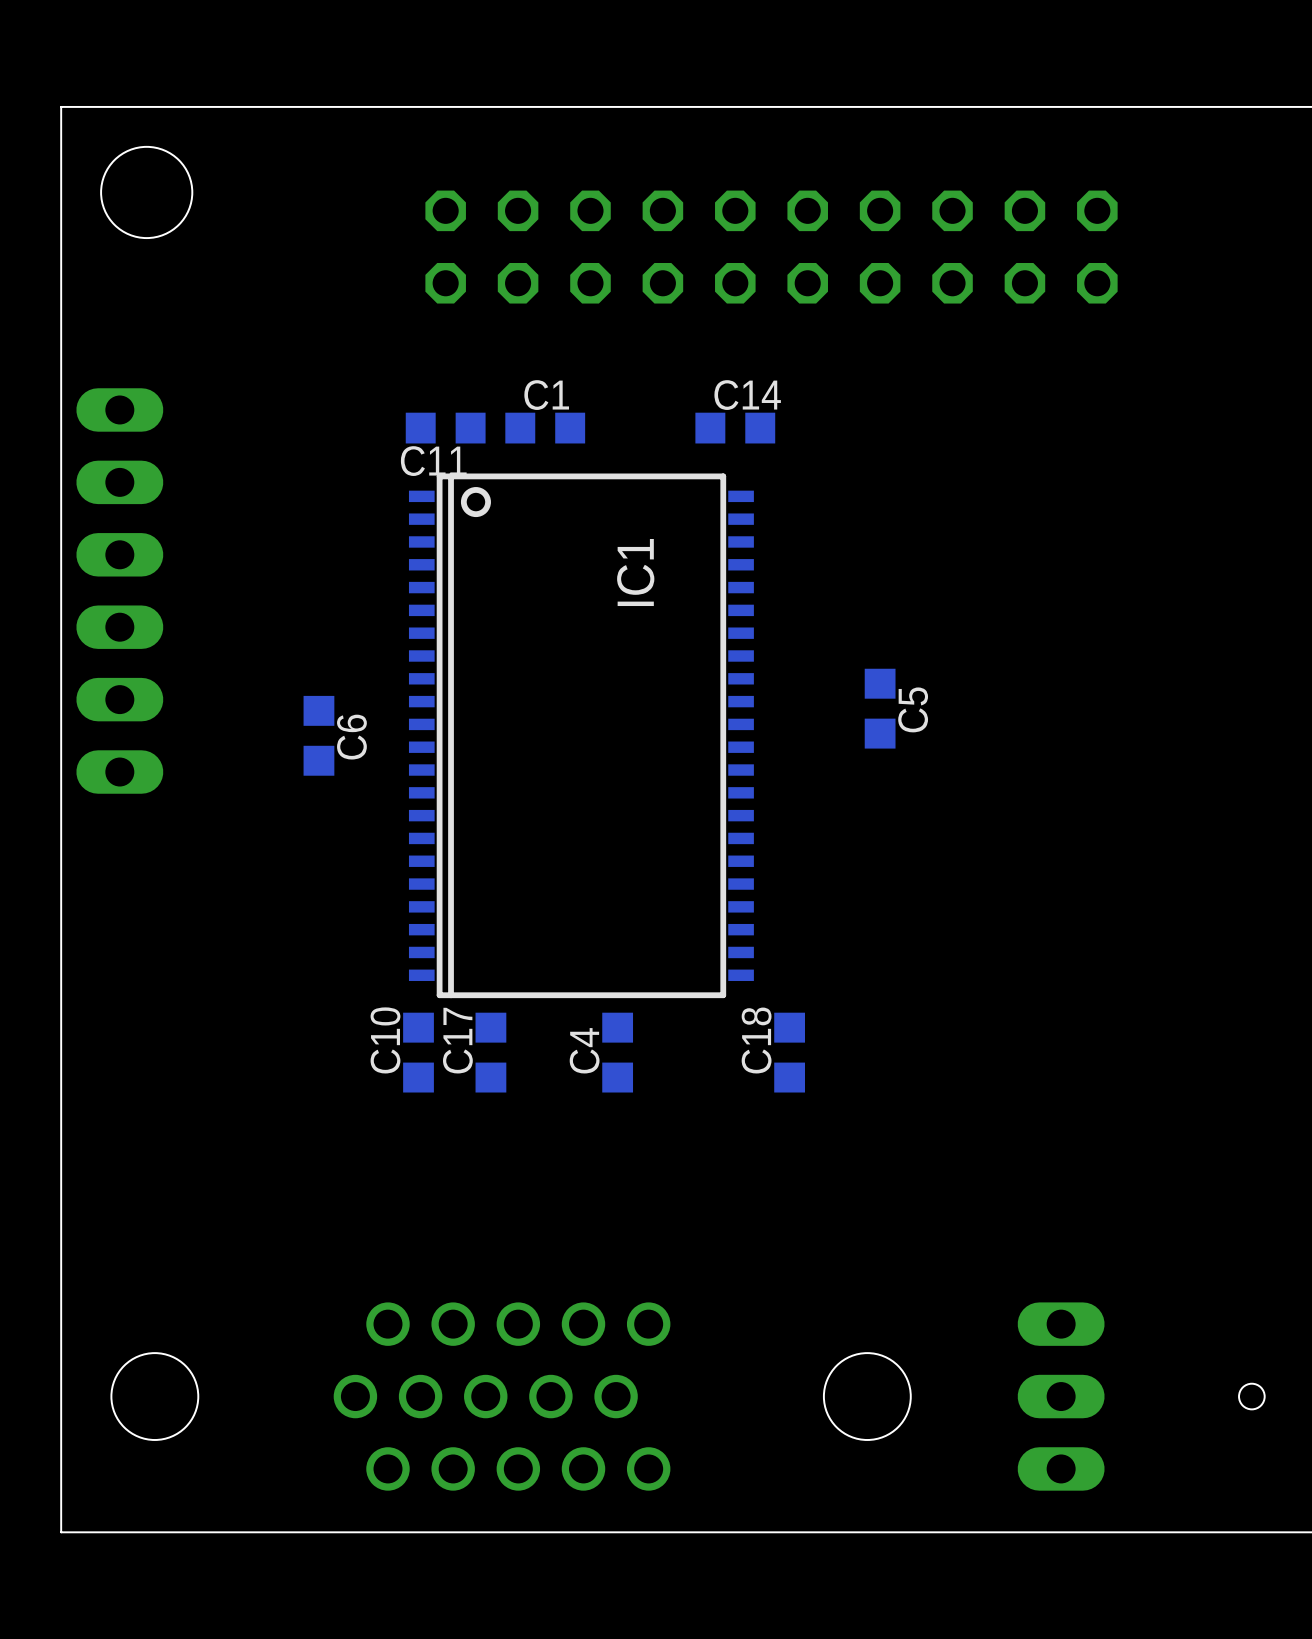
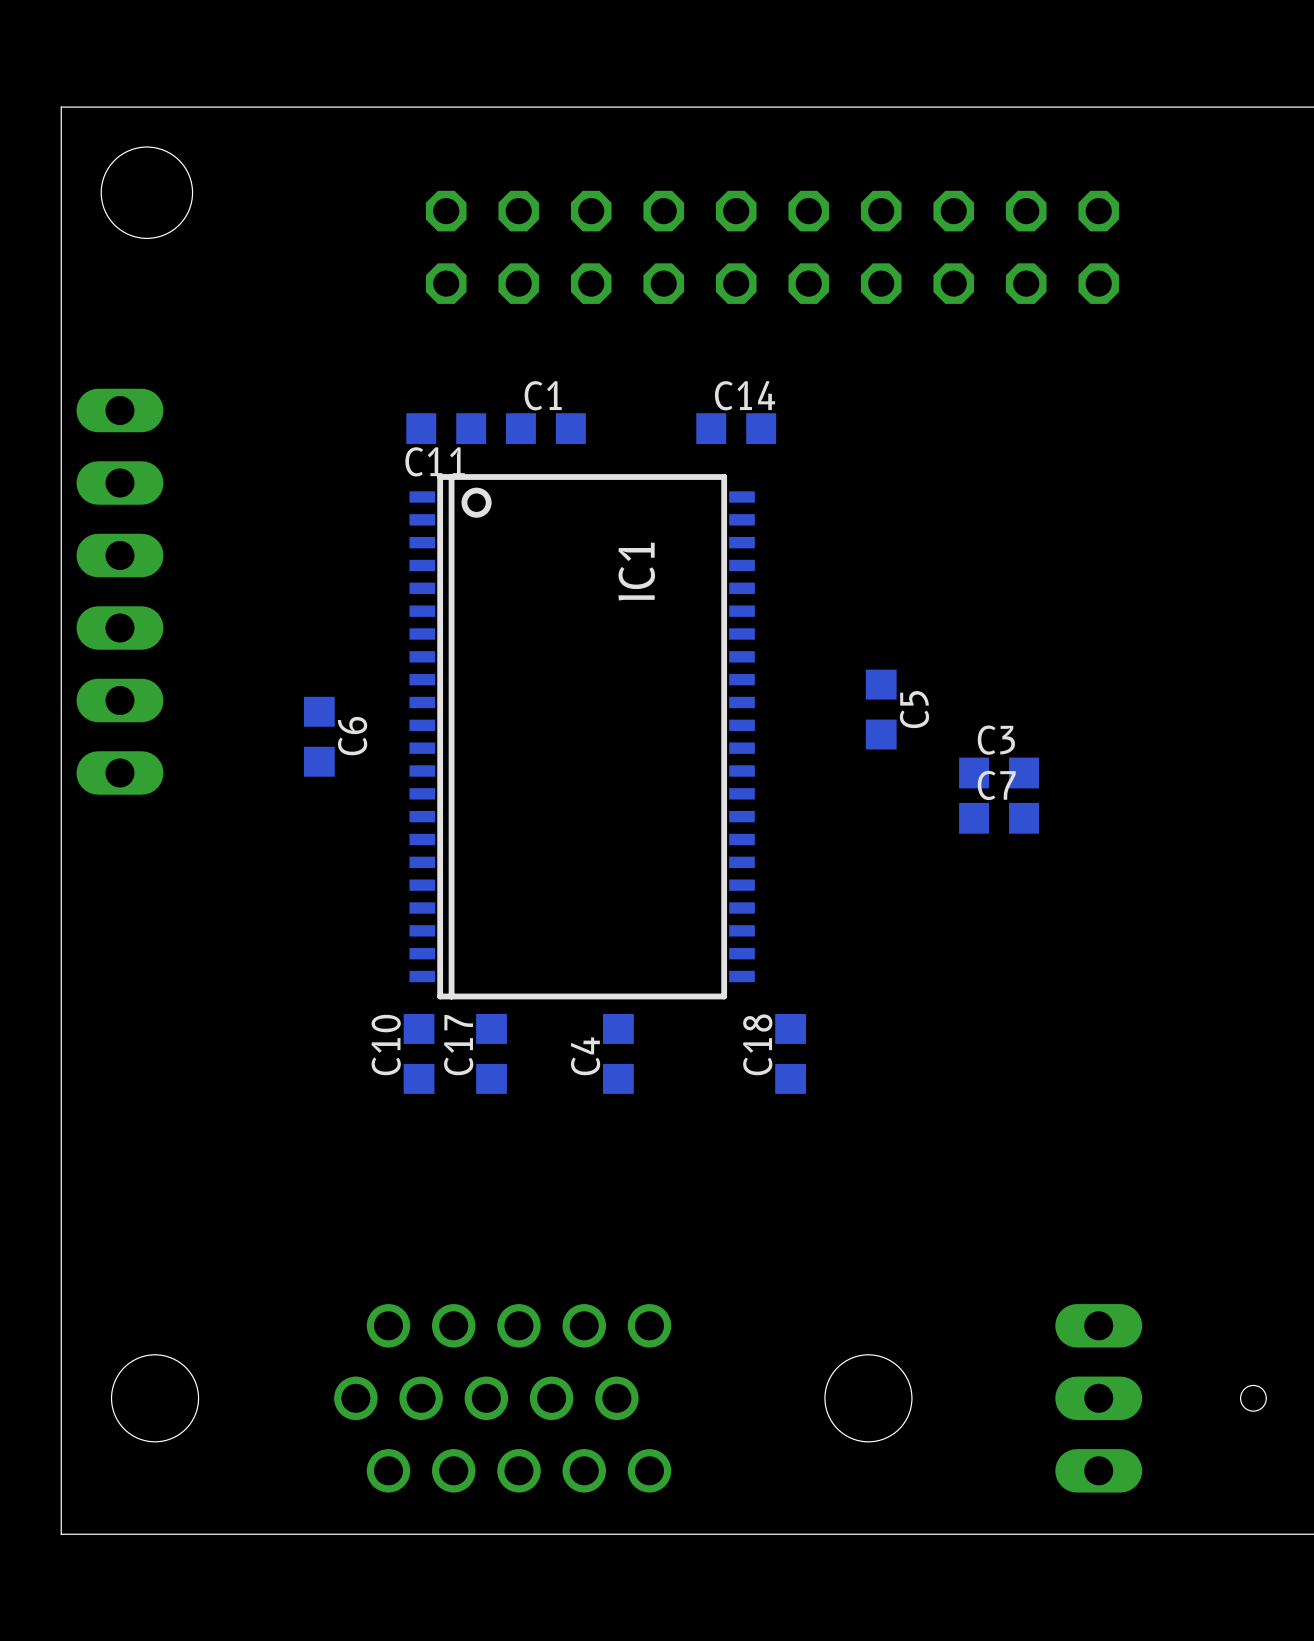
C3: none -> (999, 773)
C7: none -> (999, 818)
part position: (1061, 1396) -> (1098, 1398)

